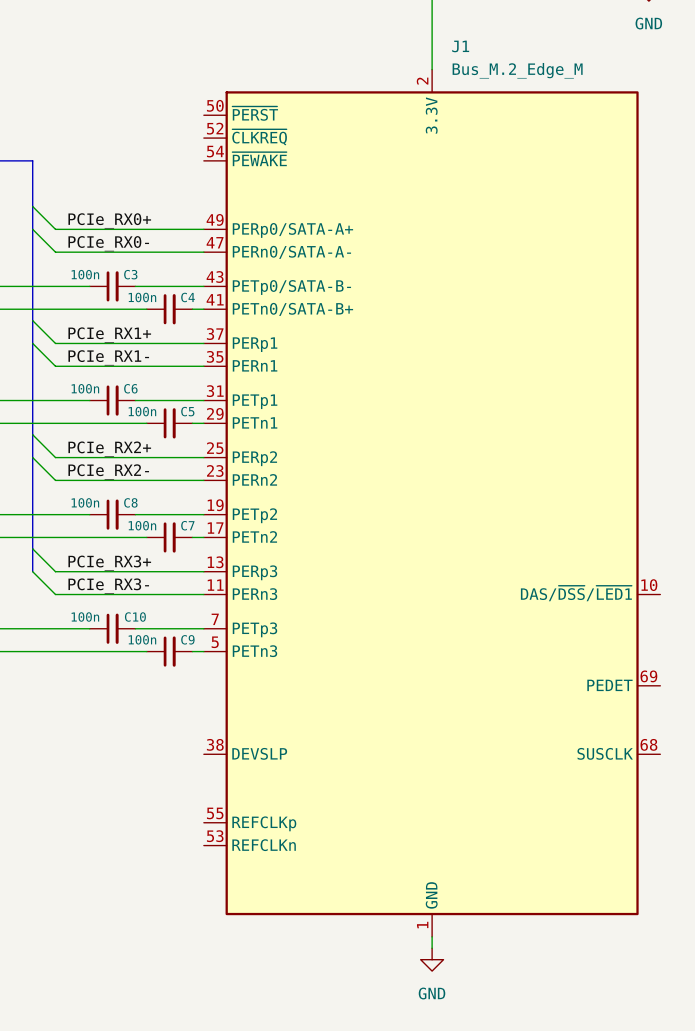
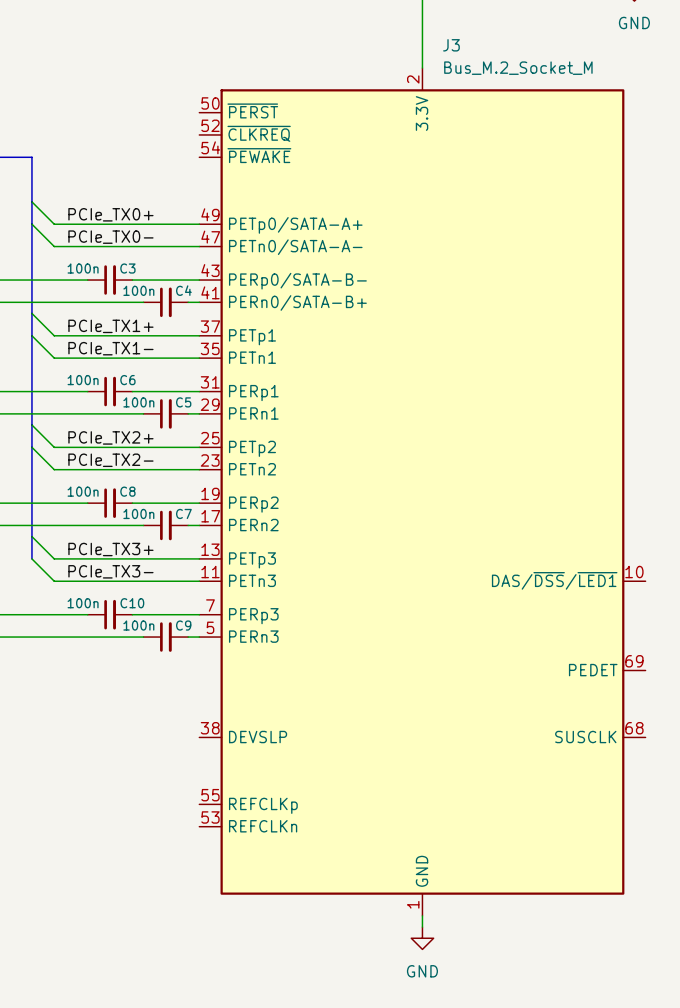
J1 name: J1 (460, 46) -> J3 (451, 45)
J1 symbol: [203, 69, 661, 937] -> [199, 68, 646, 916]
J1 value: Bus_M.2_Edge_M (517, 70) -> Bus_M.2_Socket_M (518, 68)
label: PCIe_RX0+ (109, 220) -> PCIe_TX0+ (110, 214)
label: PCIe_RX0- (108, 243) -> PCIe_TX0- (110, 237)
label: PCIe_RX1+ (109, 335) -> PCIe_TX1+ (110, 326)
label: PCIe_RX1- (108, 357) -> PCIe_TX1- (110, 348)
label: PCIe_RX2+ (109, 449) -> PCIe_TX2+ (110, 437)
label: PCIe_RX2- (108, 471) -> PCIe_TX2- (110, 460)
label: PCIe_RX3+ (109, 563) -> PCIe_TX3+ (110, 549)
label: PCIe_RX3- (108, 586) -> PCIe_TX3- (110, 571)

